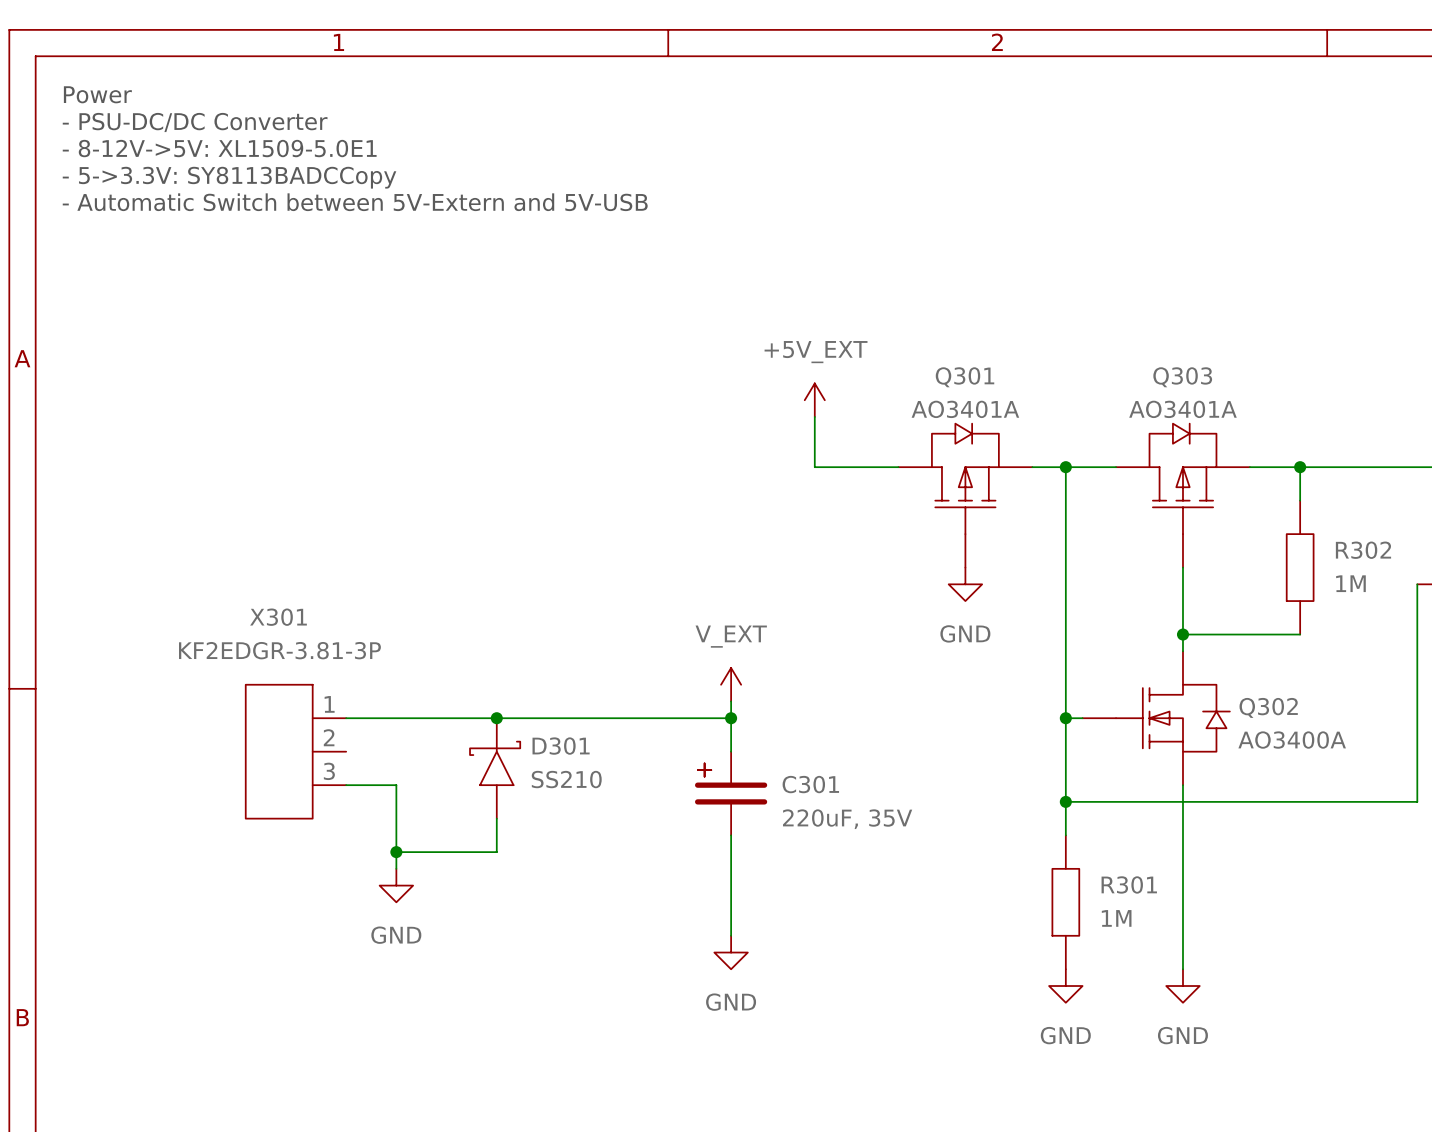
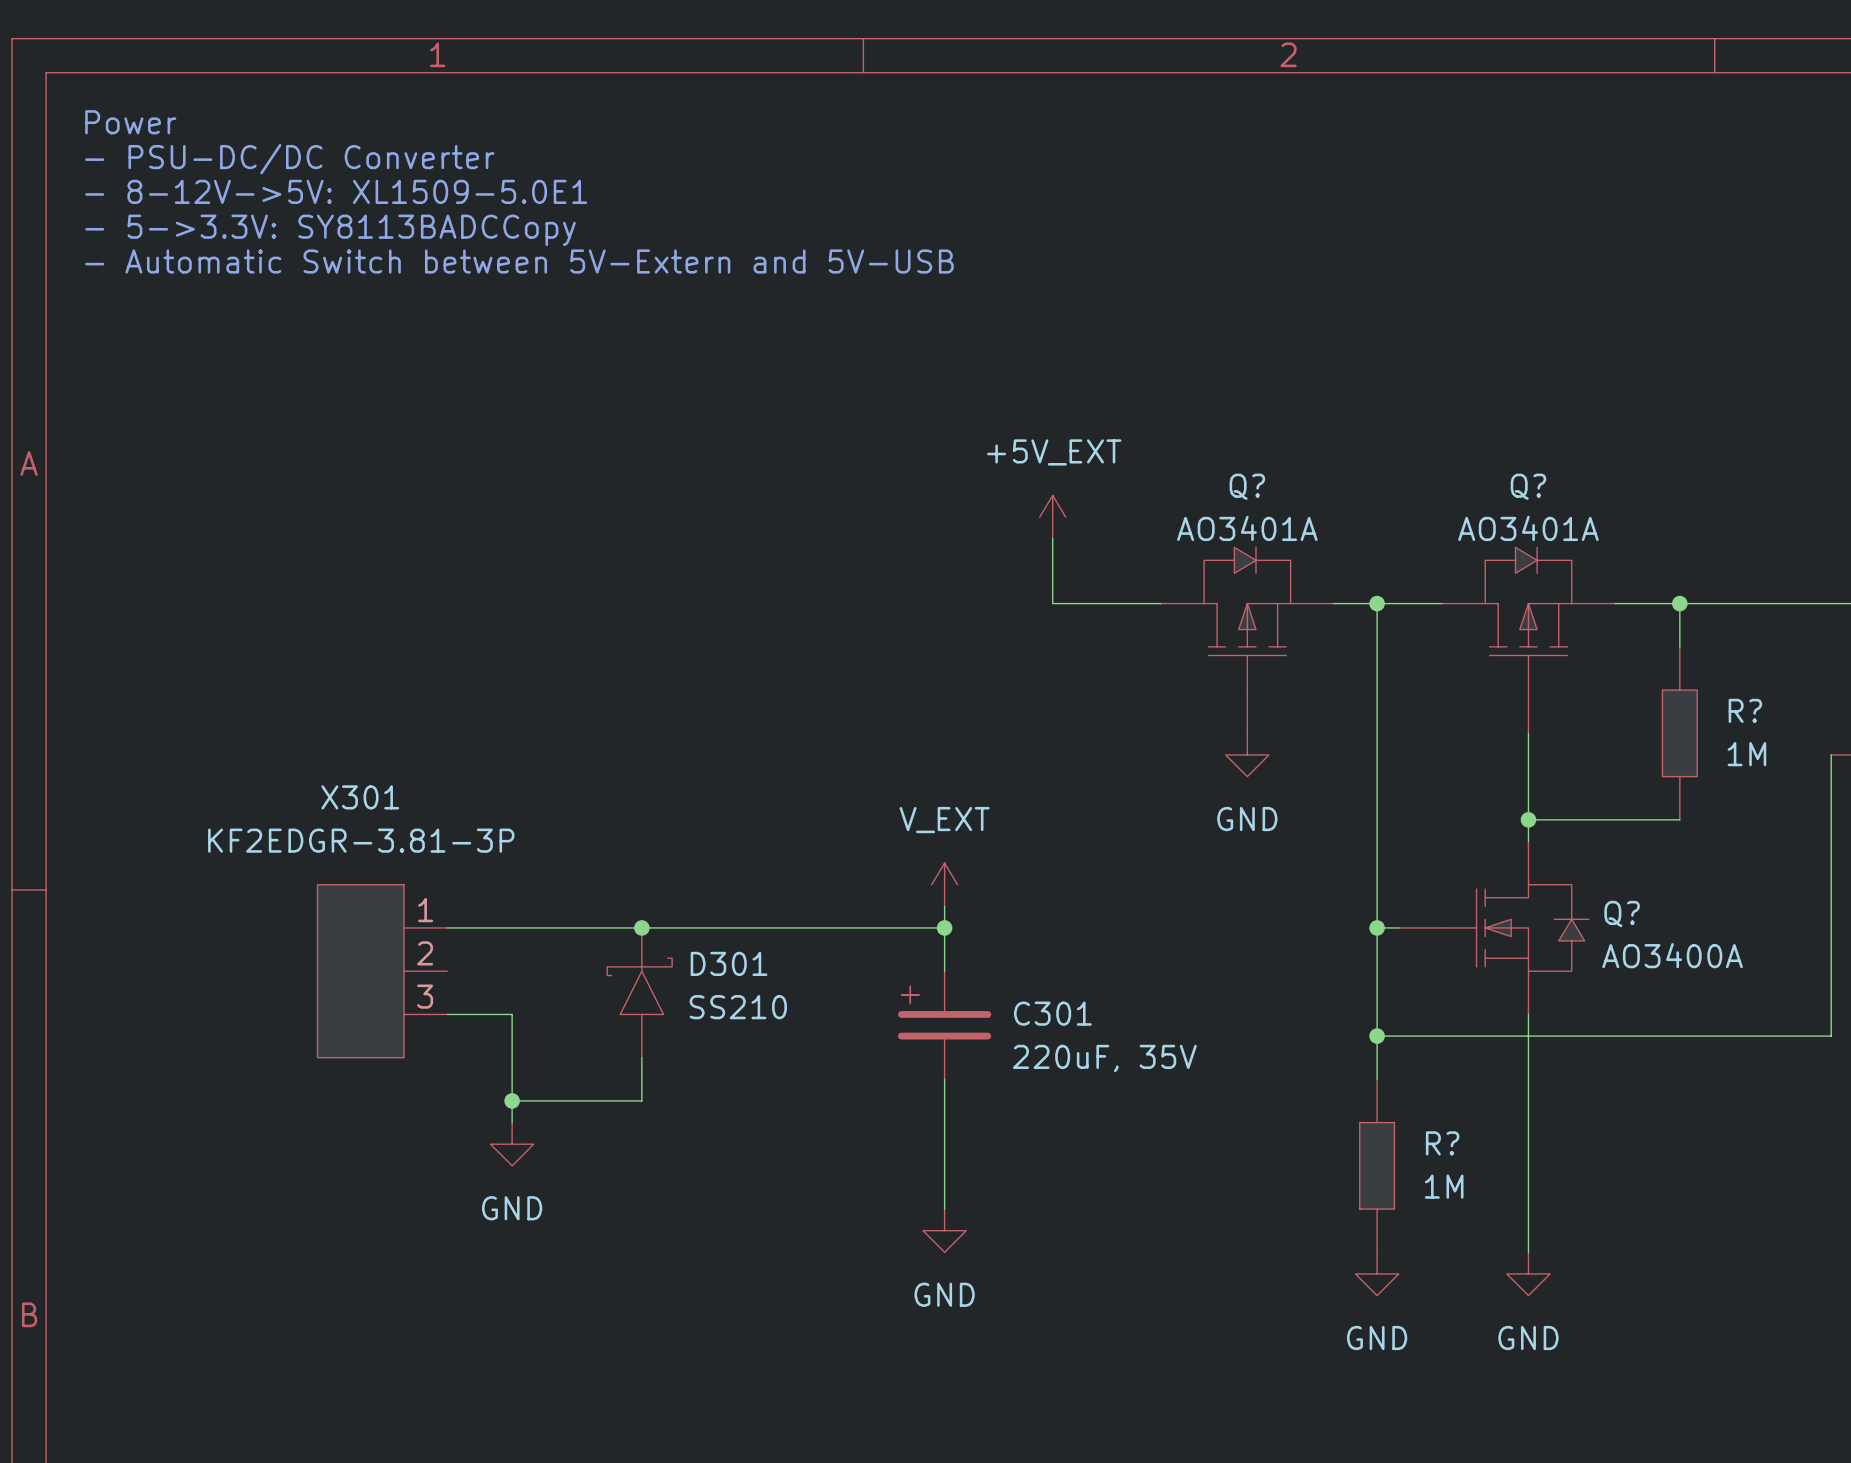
Q301 name: Q301 (965, 377) -> Q? (1247, 486)
Q303 name: Q303 (1182, 377) -> Q? (1528, 486)
R302 name: R302 (1363, 550) -> R? (1745, 710)
Q302 name: Q302 (1268, 707) -> Q? (1622, 913)
R301 name: R301 (1129, 884) -> R? (1442, 1143)

